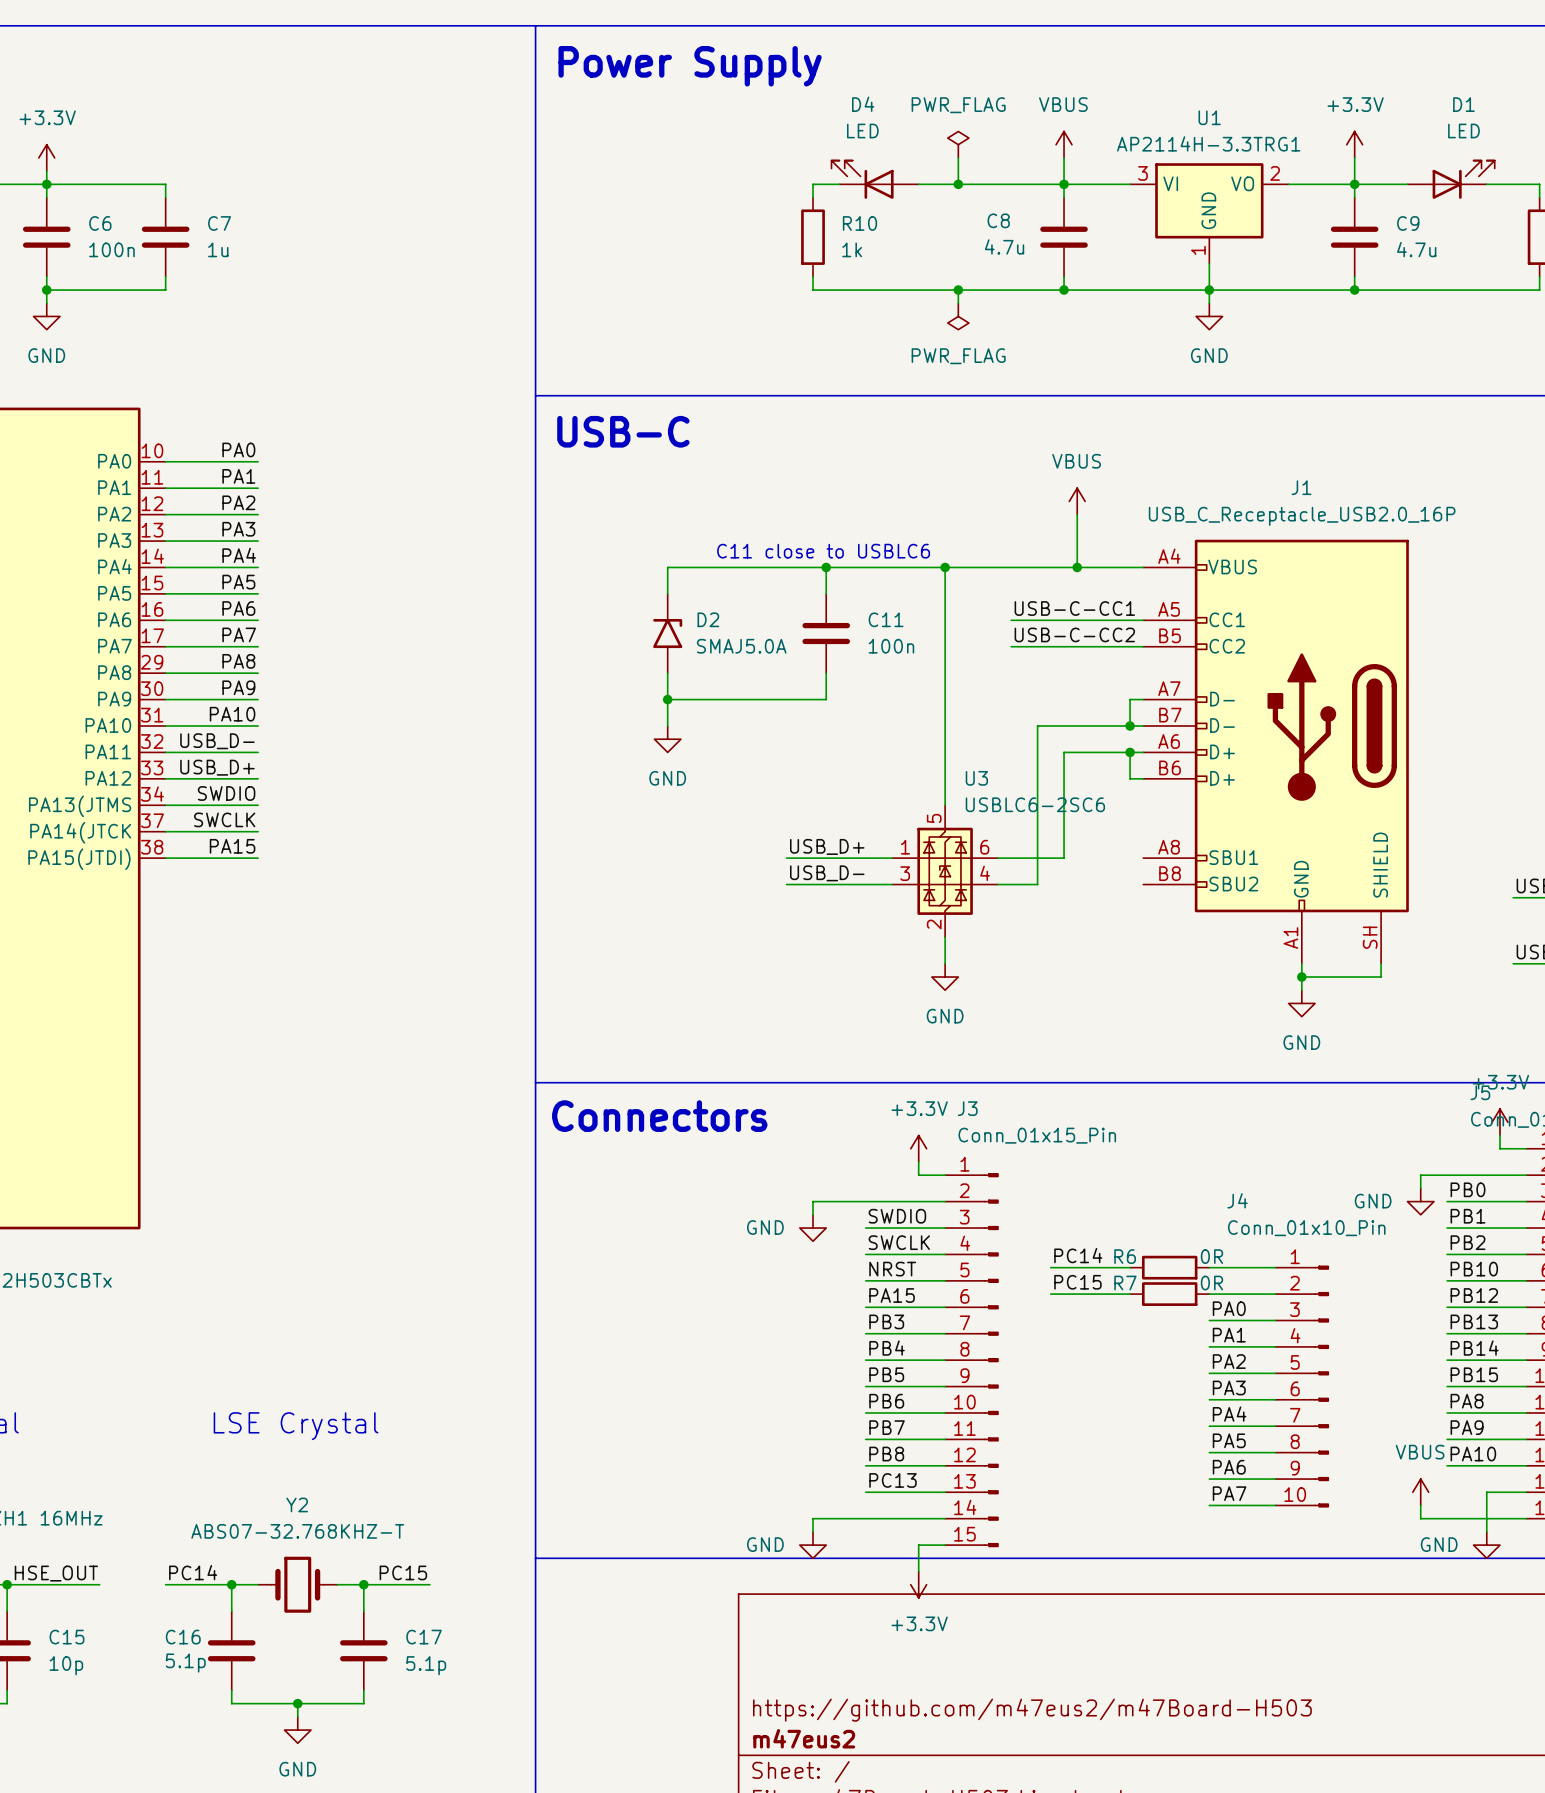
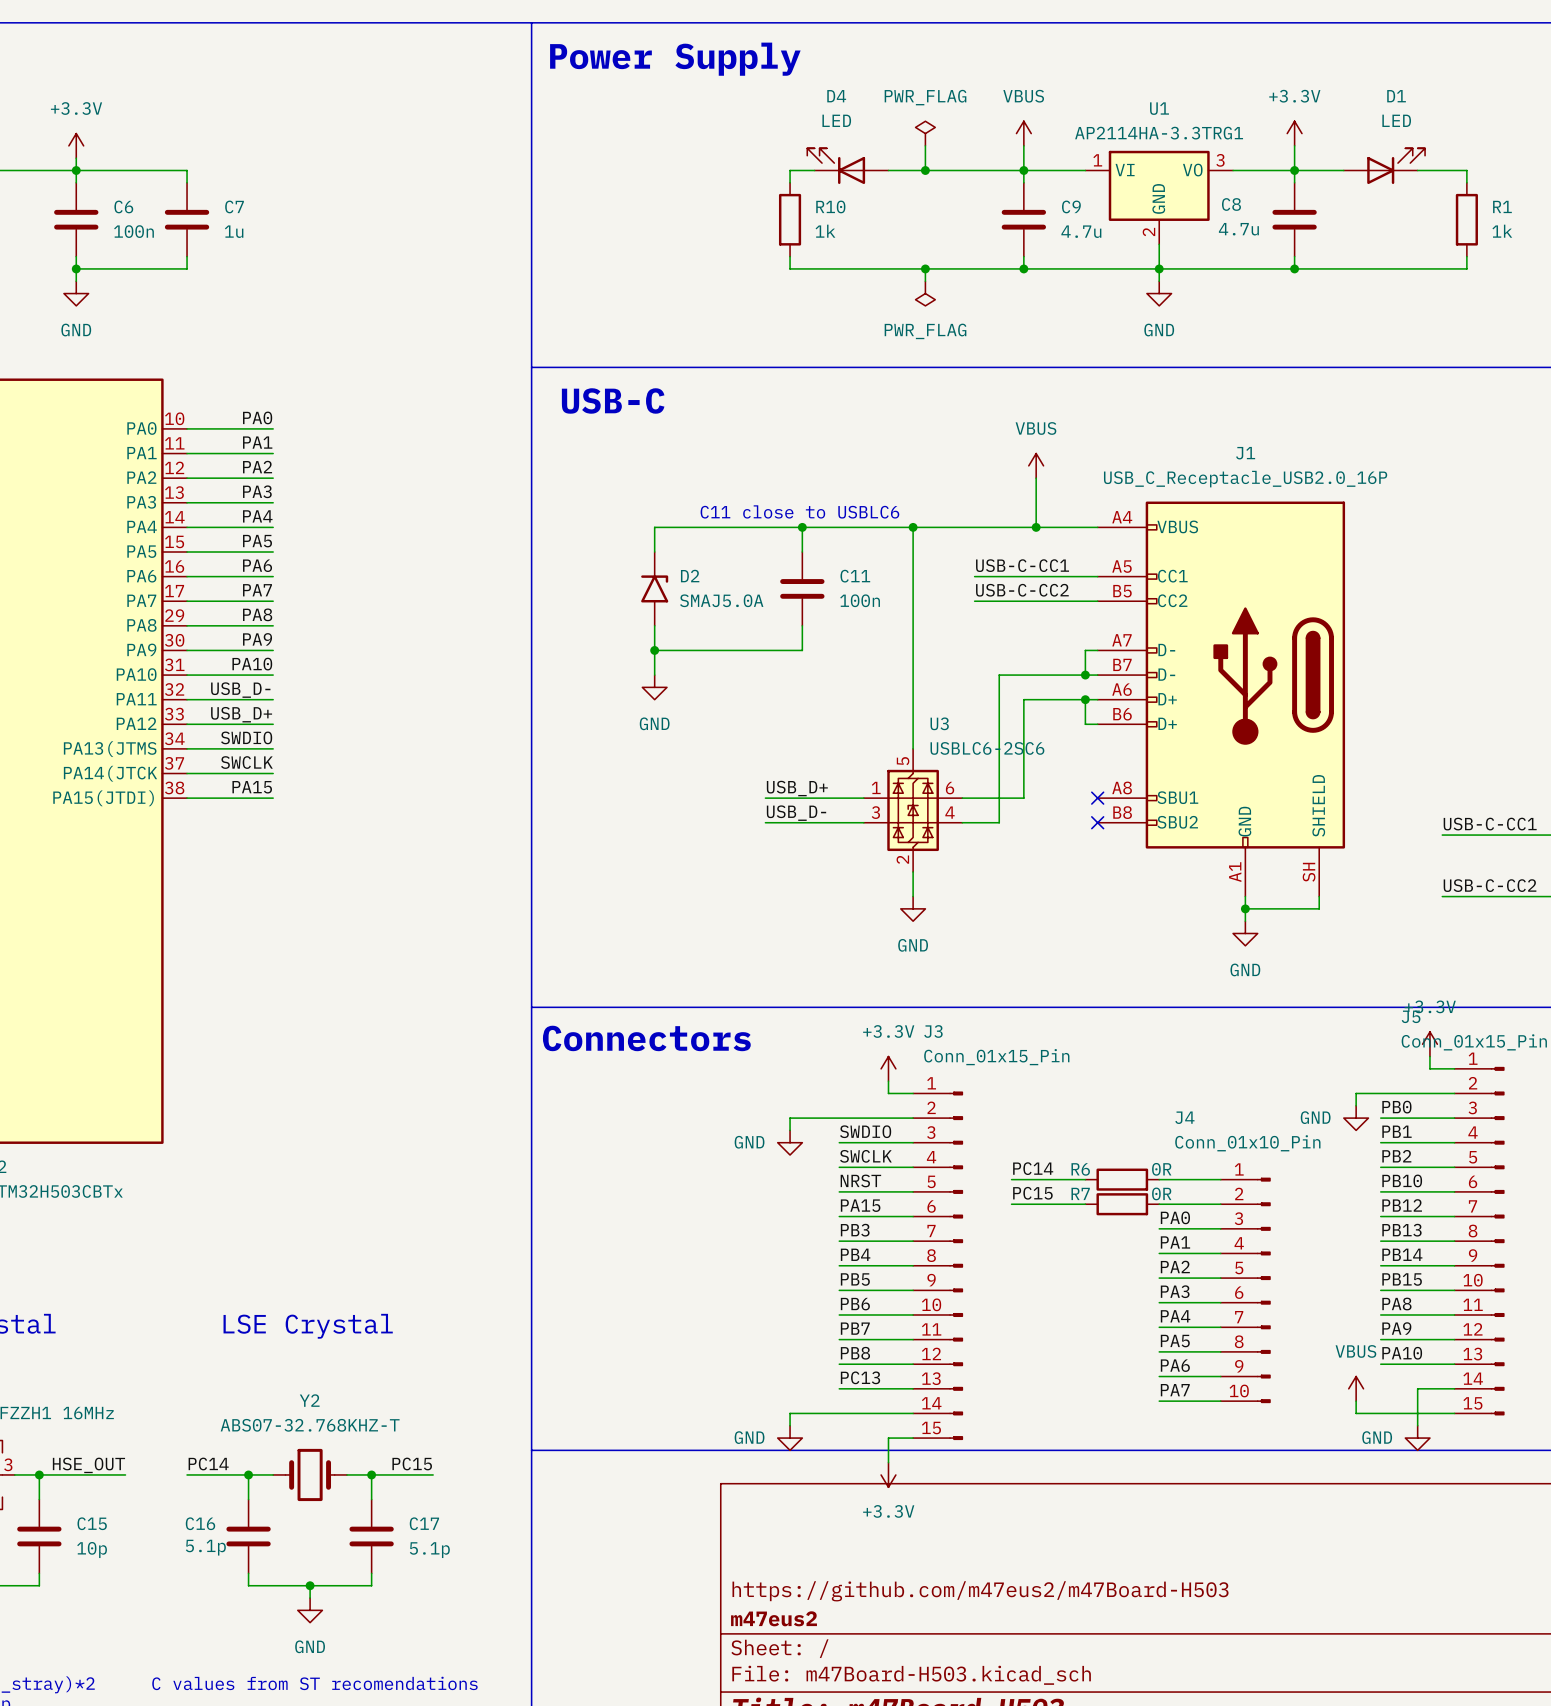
U1 value: AP2114H-3.3TRG1 (1208, 143) -> AP2114HA-3.3TRG1 (1159, 133)
U1 pin number: 3 (1142, 173) -> 1 (1097, 160)
U1 pin number: 2 (1275, 173) -> 3 (1220, 160)
C8 name: C8 (998, 220) -> C9 (1071, 206)
C9 name: C9 (1408, 223) -> C8 (1231, 204)
C8 value position: 4.7u (1004, 246) -> 4.7u (1081, 231)
C9 value position: 4.7u (1416, 249) -> 4.7u (1238, 229)
U1 pin number: 1 (1198, 250) -> 2 (1148, 232)
no-connect mark: none -> (1097, 798)
no-connect mark: none -> (1097, 822)

